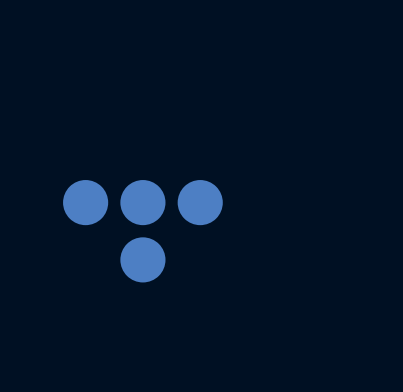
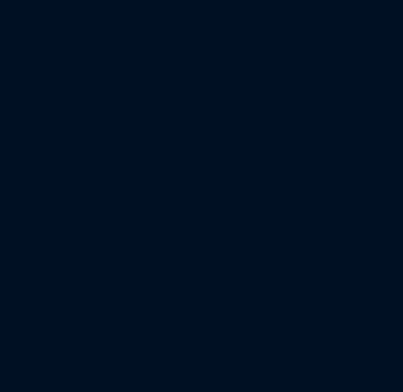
part: (85, 202) -> none
part: (142, 202) -> none
part: (200, 202) -> none
part: (142, 259) -> none

